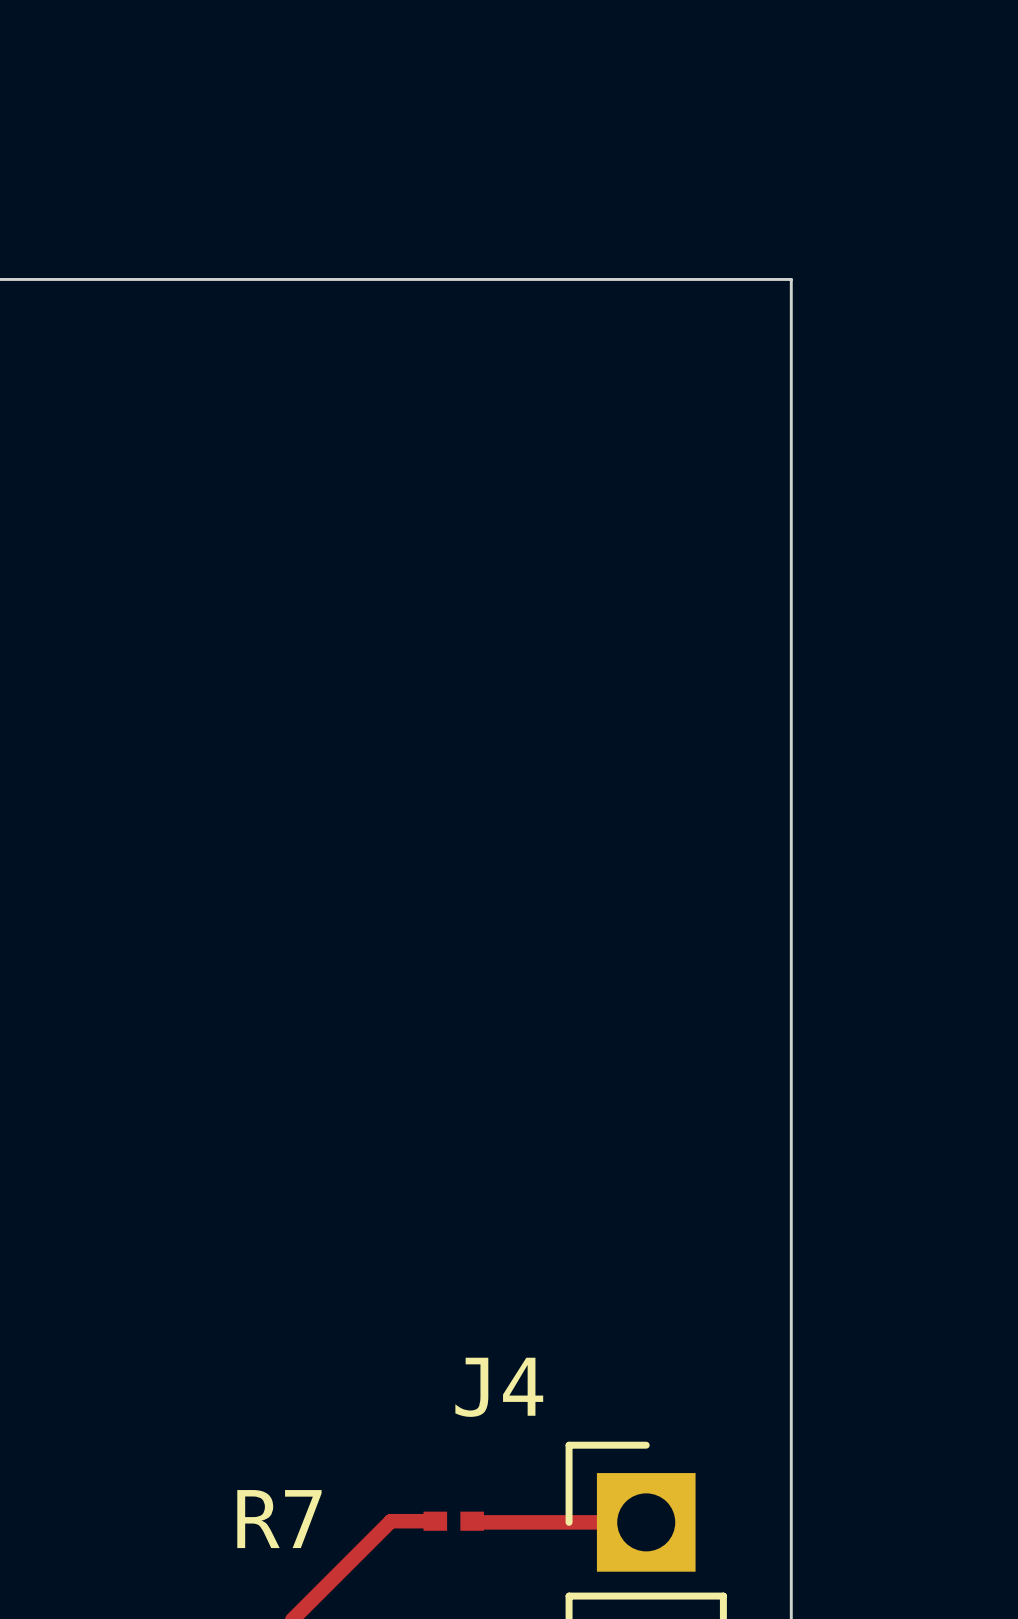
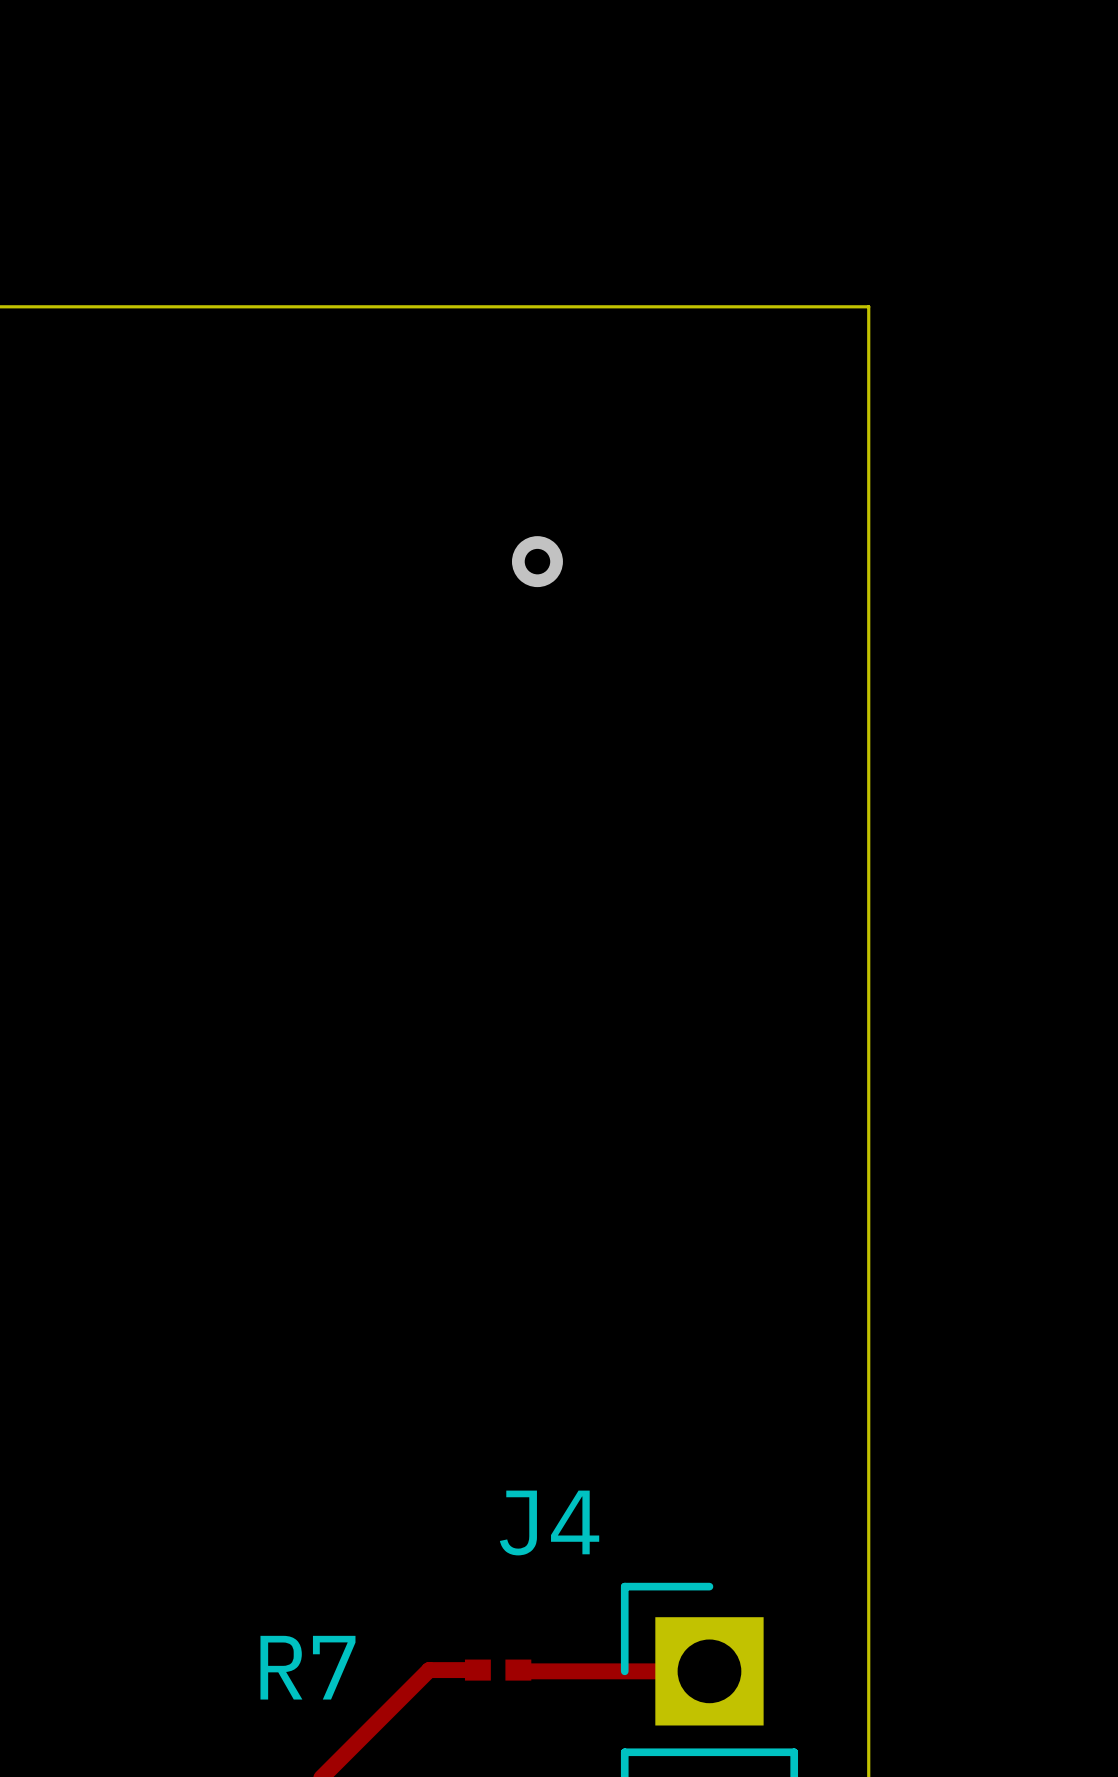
via: none -> (537, 561)

